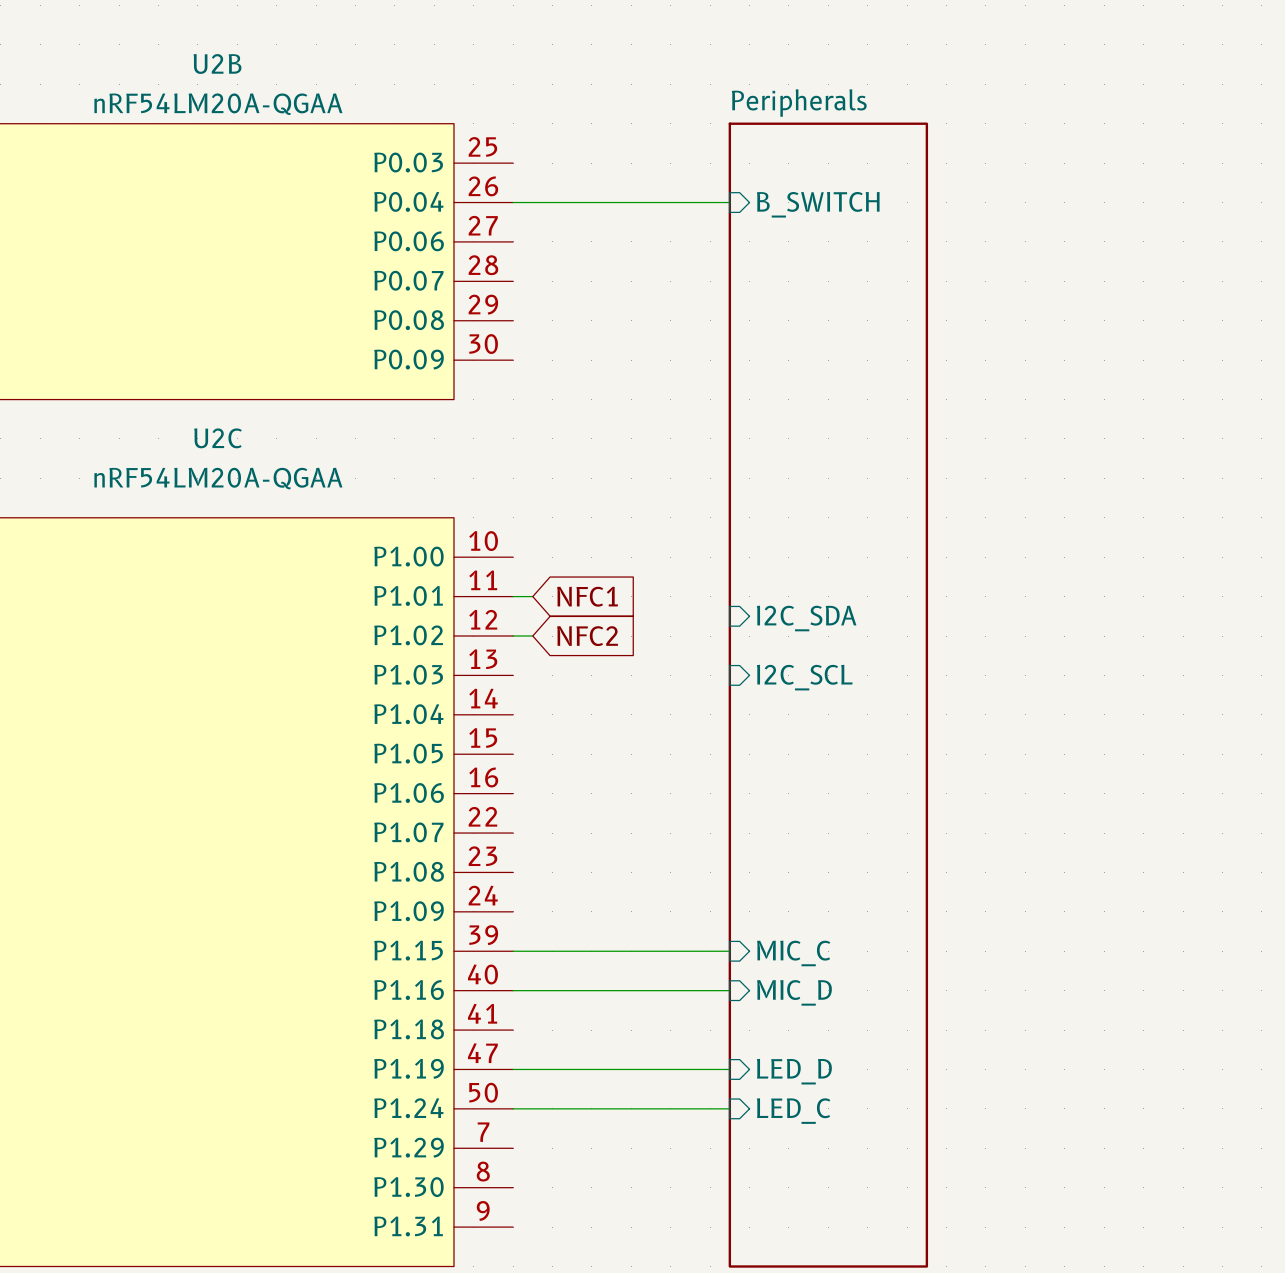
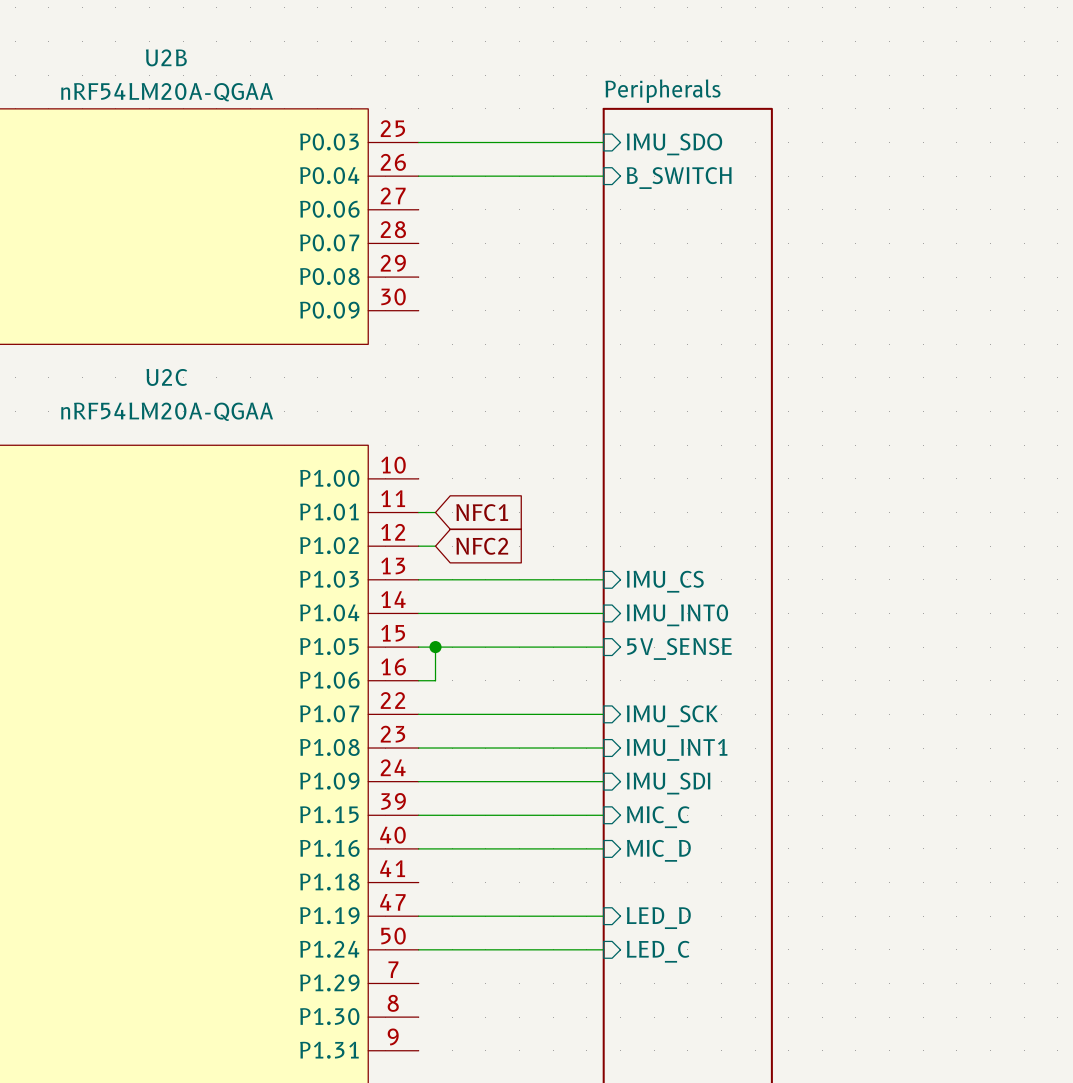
wire: none -> (418, 142) (603, 142)
sheet pin: none -> IMU_SDO (674, 144)
sheet pin: I2C_SDA (806, 618) -> none
wire: none -> (418, 579) (603, 579)
sheet pin: I2C_SCL (804, 677) -> IMU_CS (665, 581)
wire: none -> (418, 613) (603, 613)
sheet pin: none -> IMU_INT0 (677, 615)
wire: none -> (418, 647) (603, 647)
wire: none -> (435, 647) (435, 680) (418, 680)
junction: none -> (435, 647)
sheet pin: none -> 5V_SENSE (679, 648)
wire: none -> (418, 714) (603, 714)
sheet pin: none -> IMU_SCK (672, 716)
wire: none -> (418, 748) (603, 748)
sheet pin: none -> IMU_INT1 (677, 749)
wire: none -> (418, 781) (603, 781)
sheet pin: none -> IMU_SDI (668, 783)

